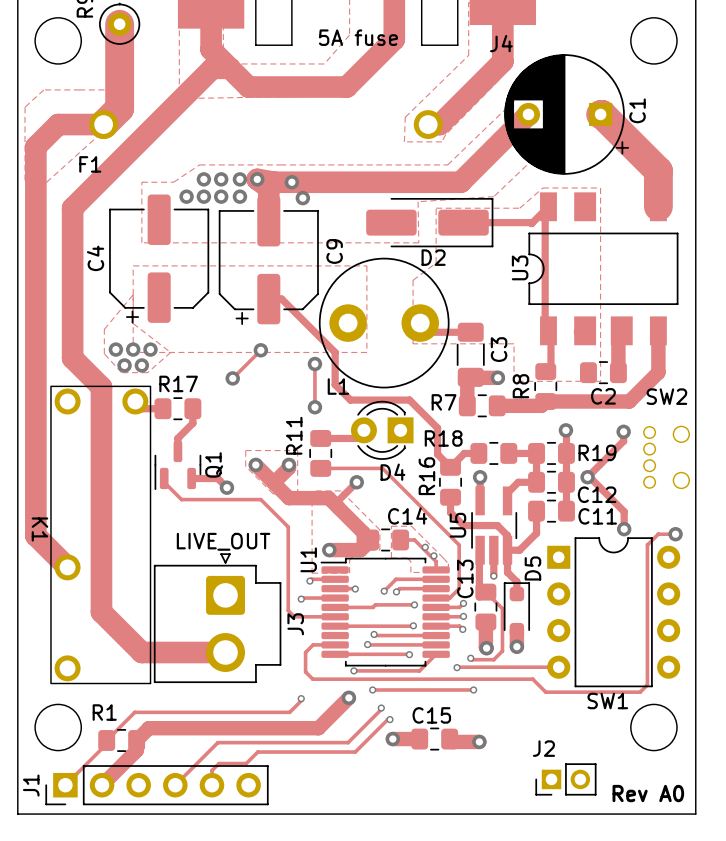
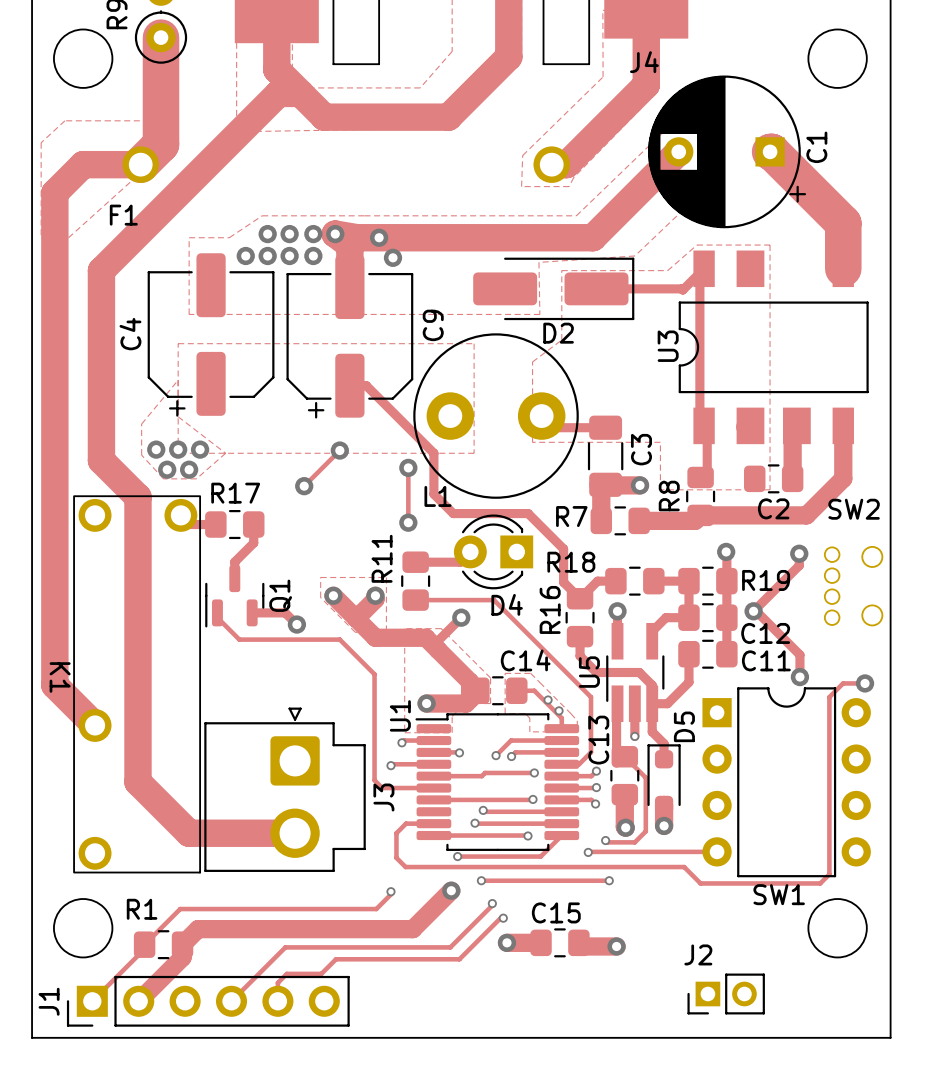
text: 5A fuse (358, 37) -> none
text: LIVE_OUT (223, 541) -> none
text: Rev A0 (648, 793) -> none

